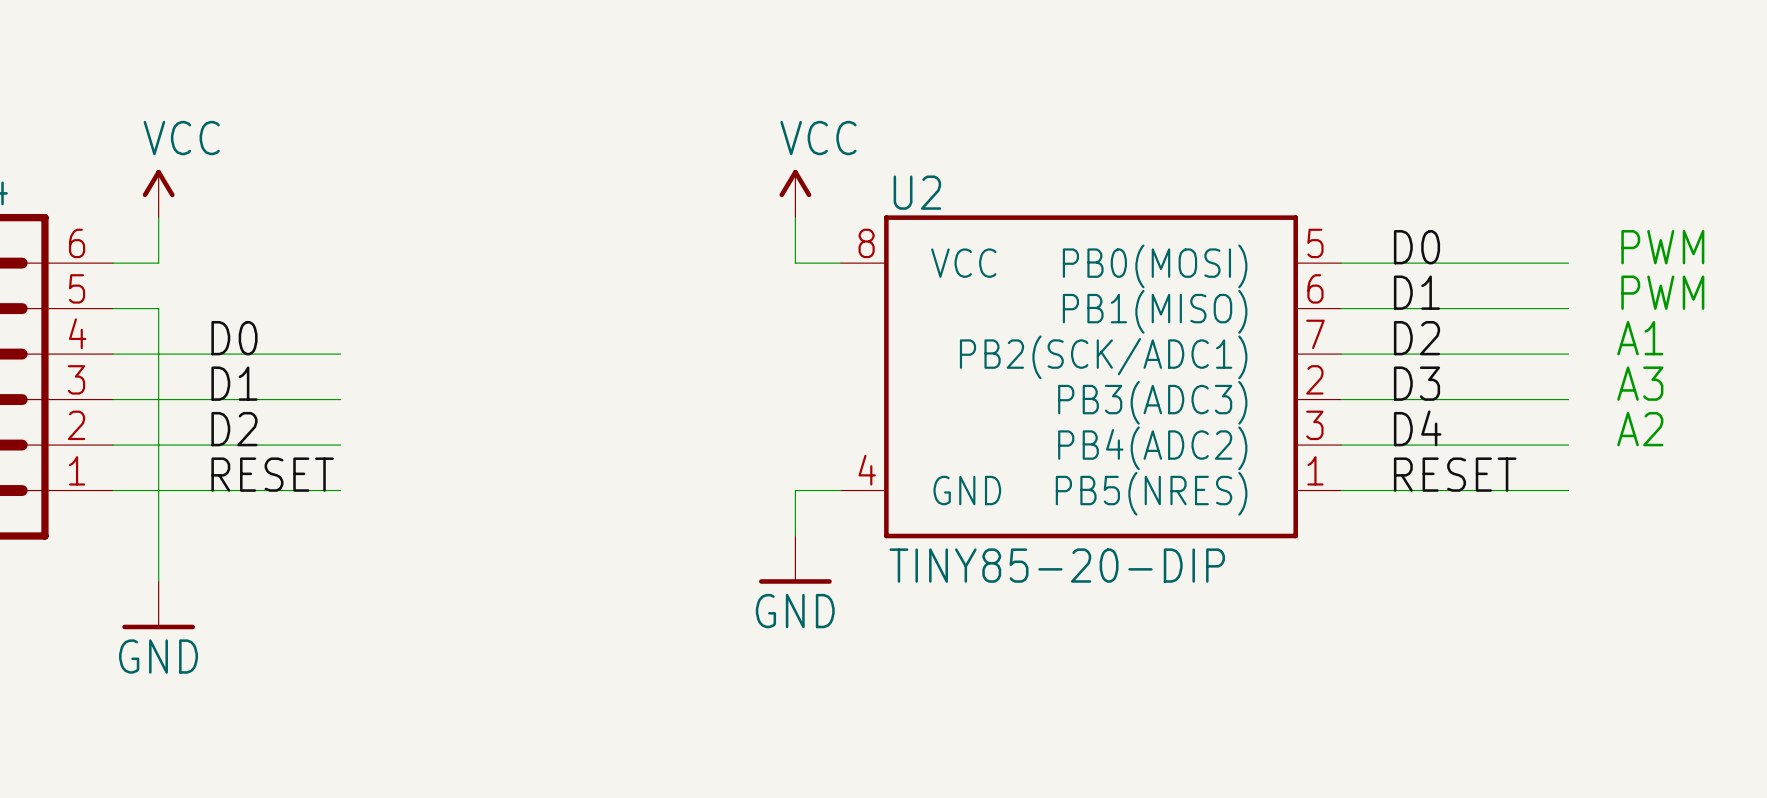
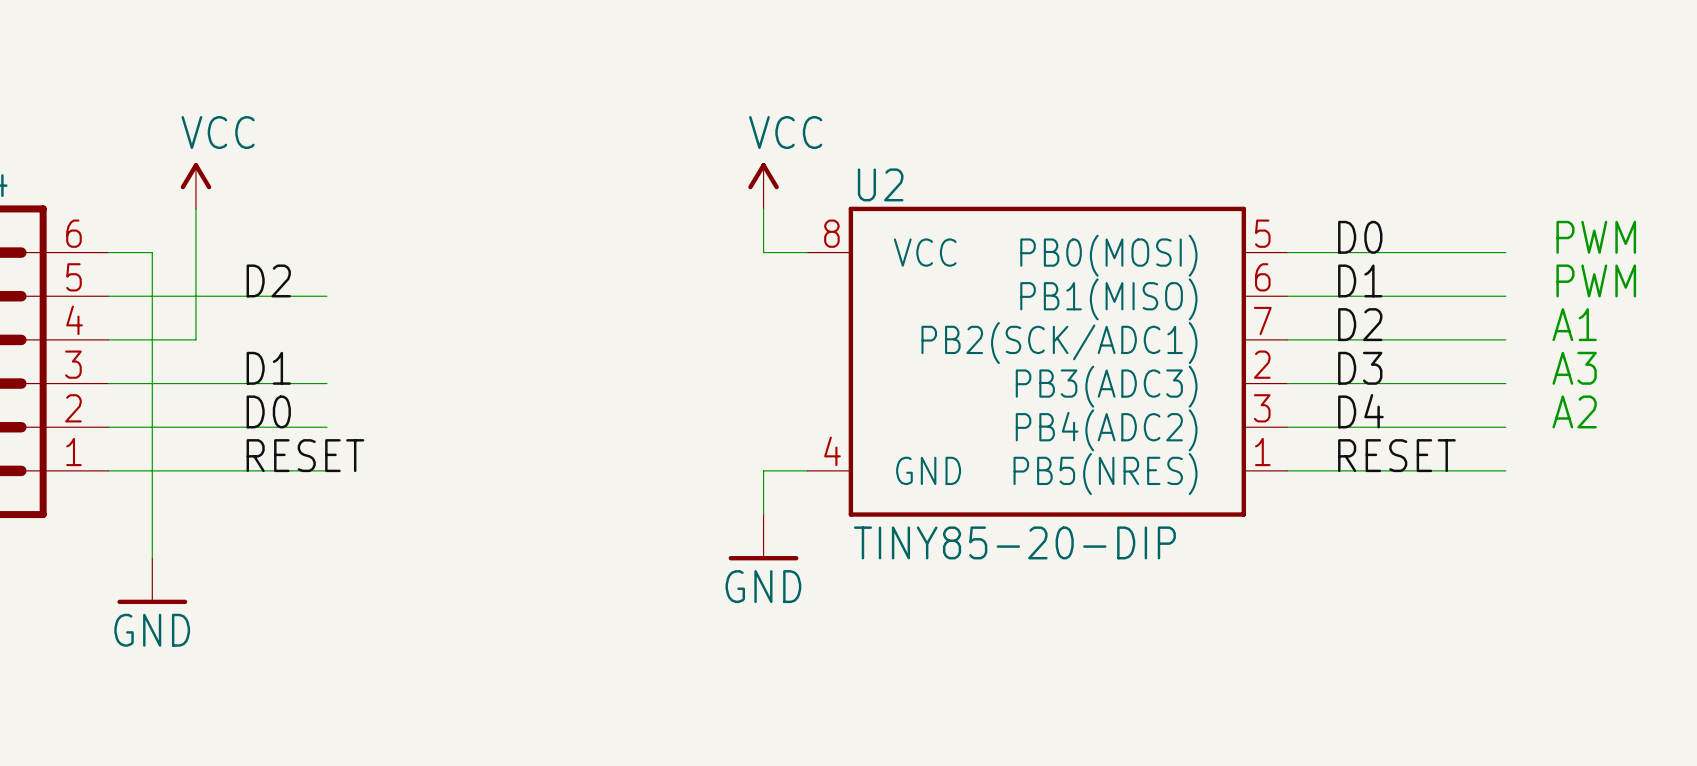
power symbol position: VCC (158, 193) -> VCC (195, 186)
wire: (158, 217) (158, 263) -> (326, 296) (152, 296) (152, 252)
label position: D0 (234, 338) -> D0 (268, 411)
wire: (204, 354) (340, 354) -> (195, 339) (195, 208)
label position: D1 (234, 383) -> D1 (268, 368)
label position: D2 (234, 429) -> D2 (268, 280)
label position: RESET (272, 474) -> RESET (305, 455)

